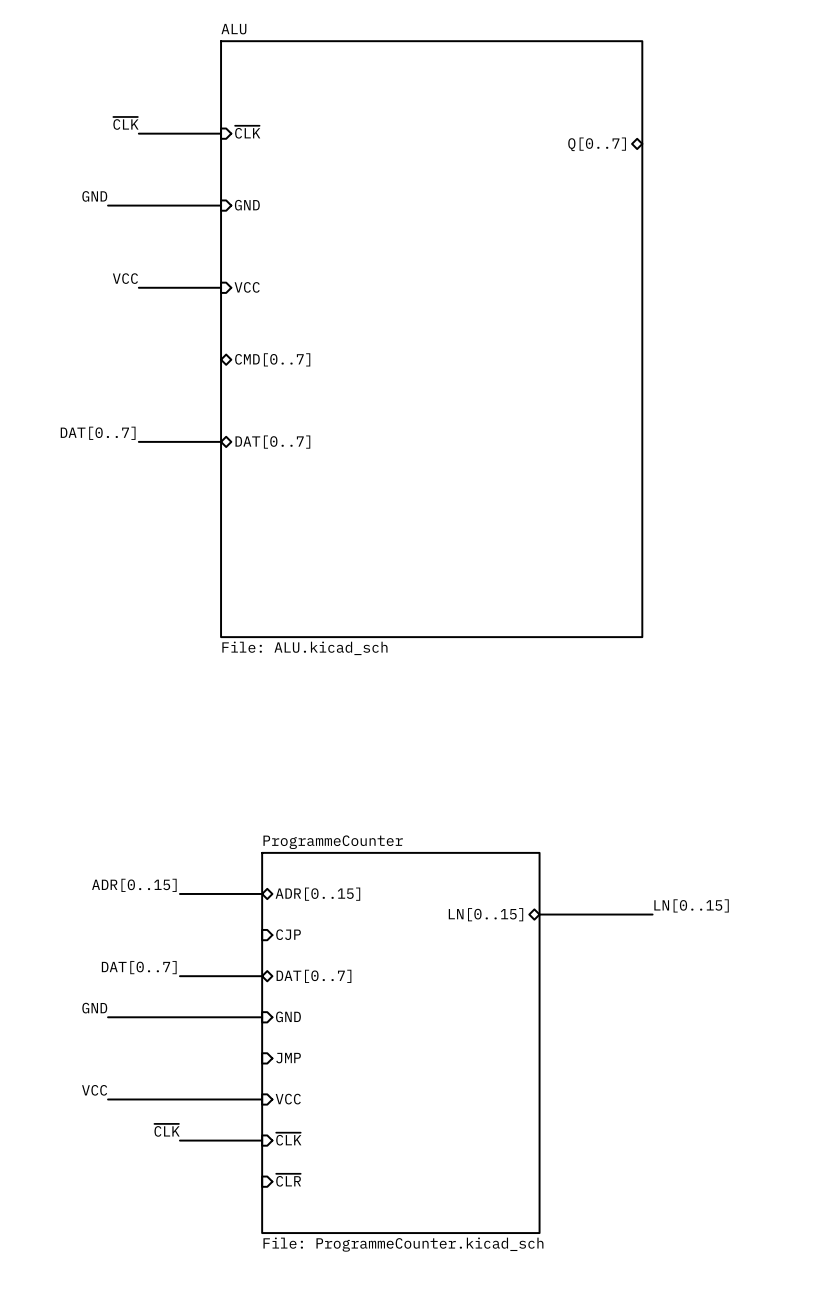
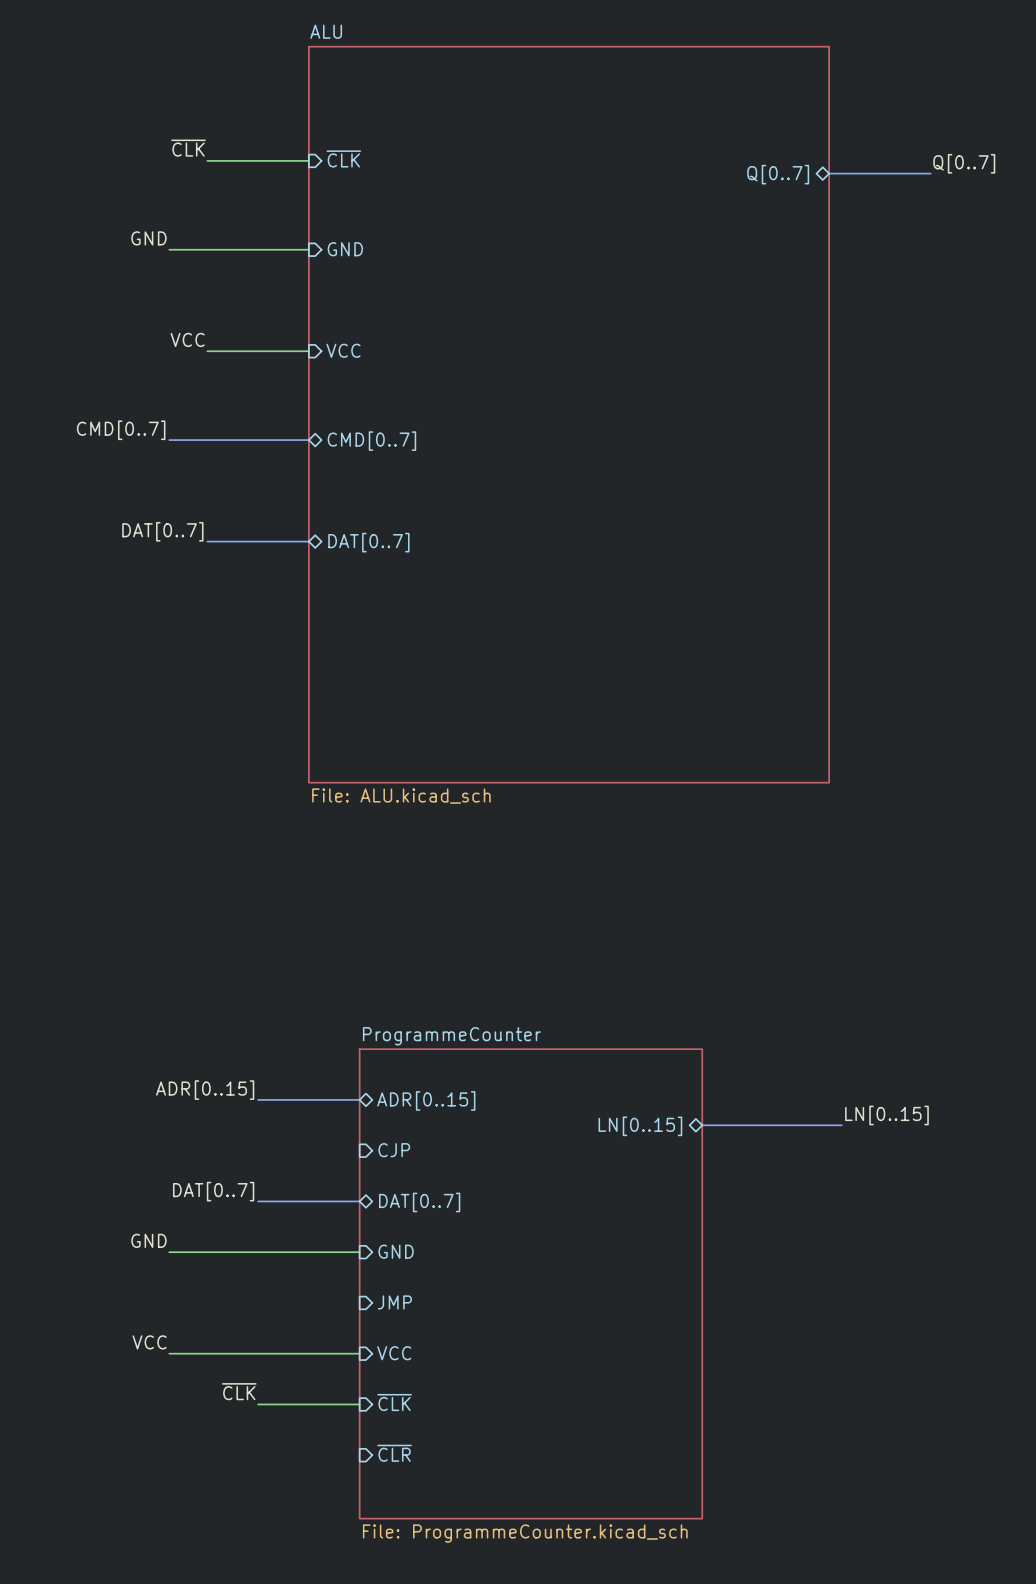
label: none -> Q[0..7] (964, 163)
bus: none -> (829, 173) (930, 173)
label: none -> CMD[0..7] (121, 430)
bus: none -> (169, 440) (308, 440)

